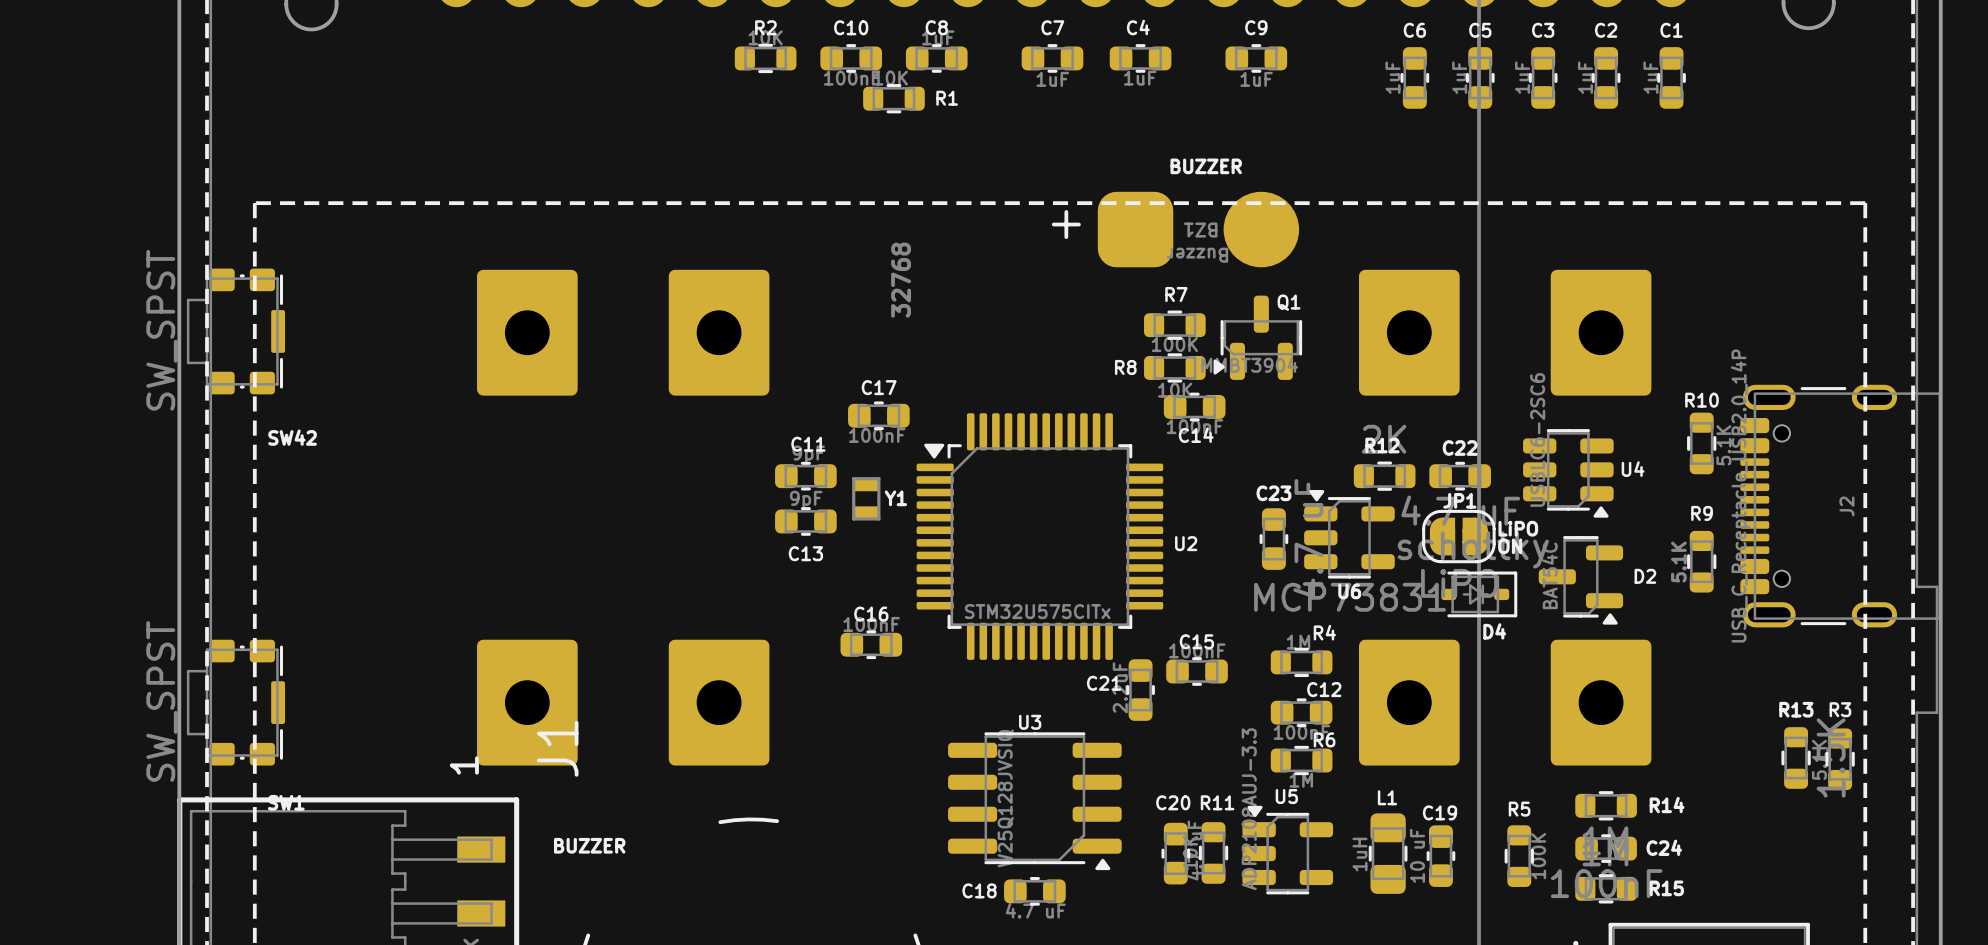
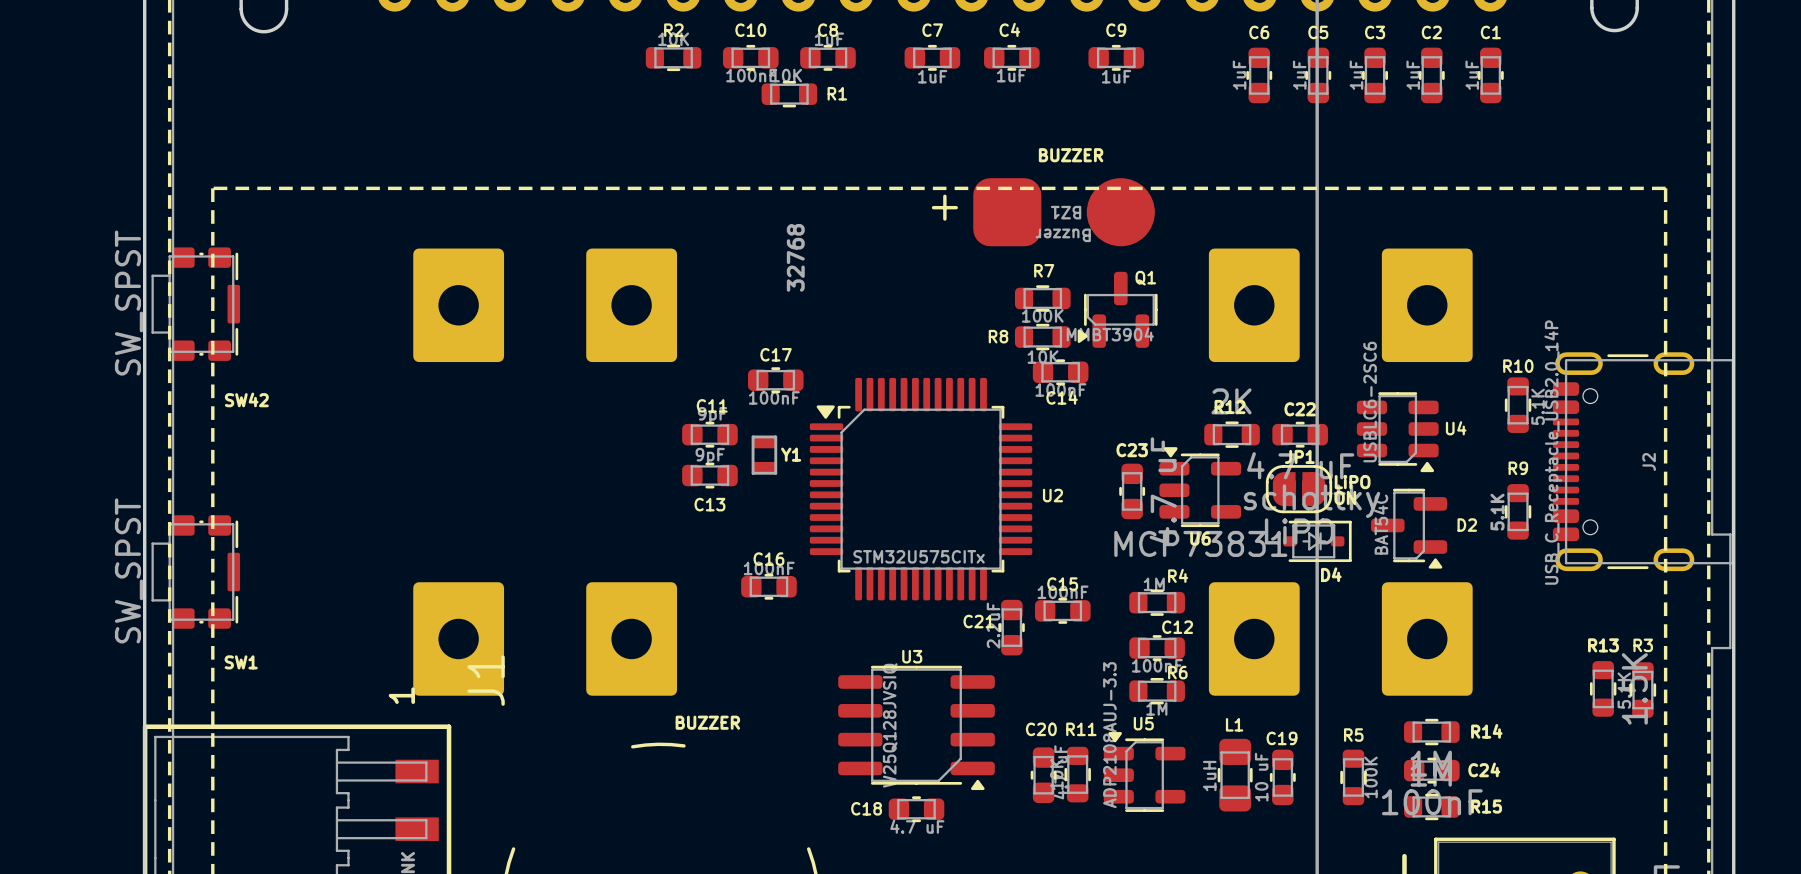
SW1 position: (235, 702) -> (195, 572)
text position: BUZZER (589, 845) -> BUZZER (707, 722)

